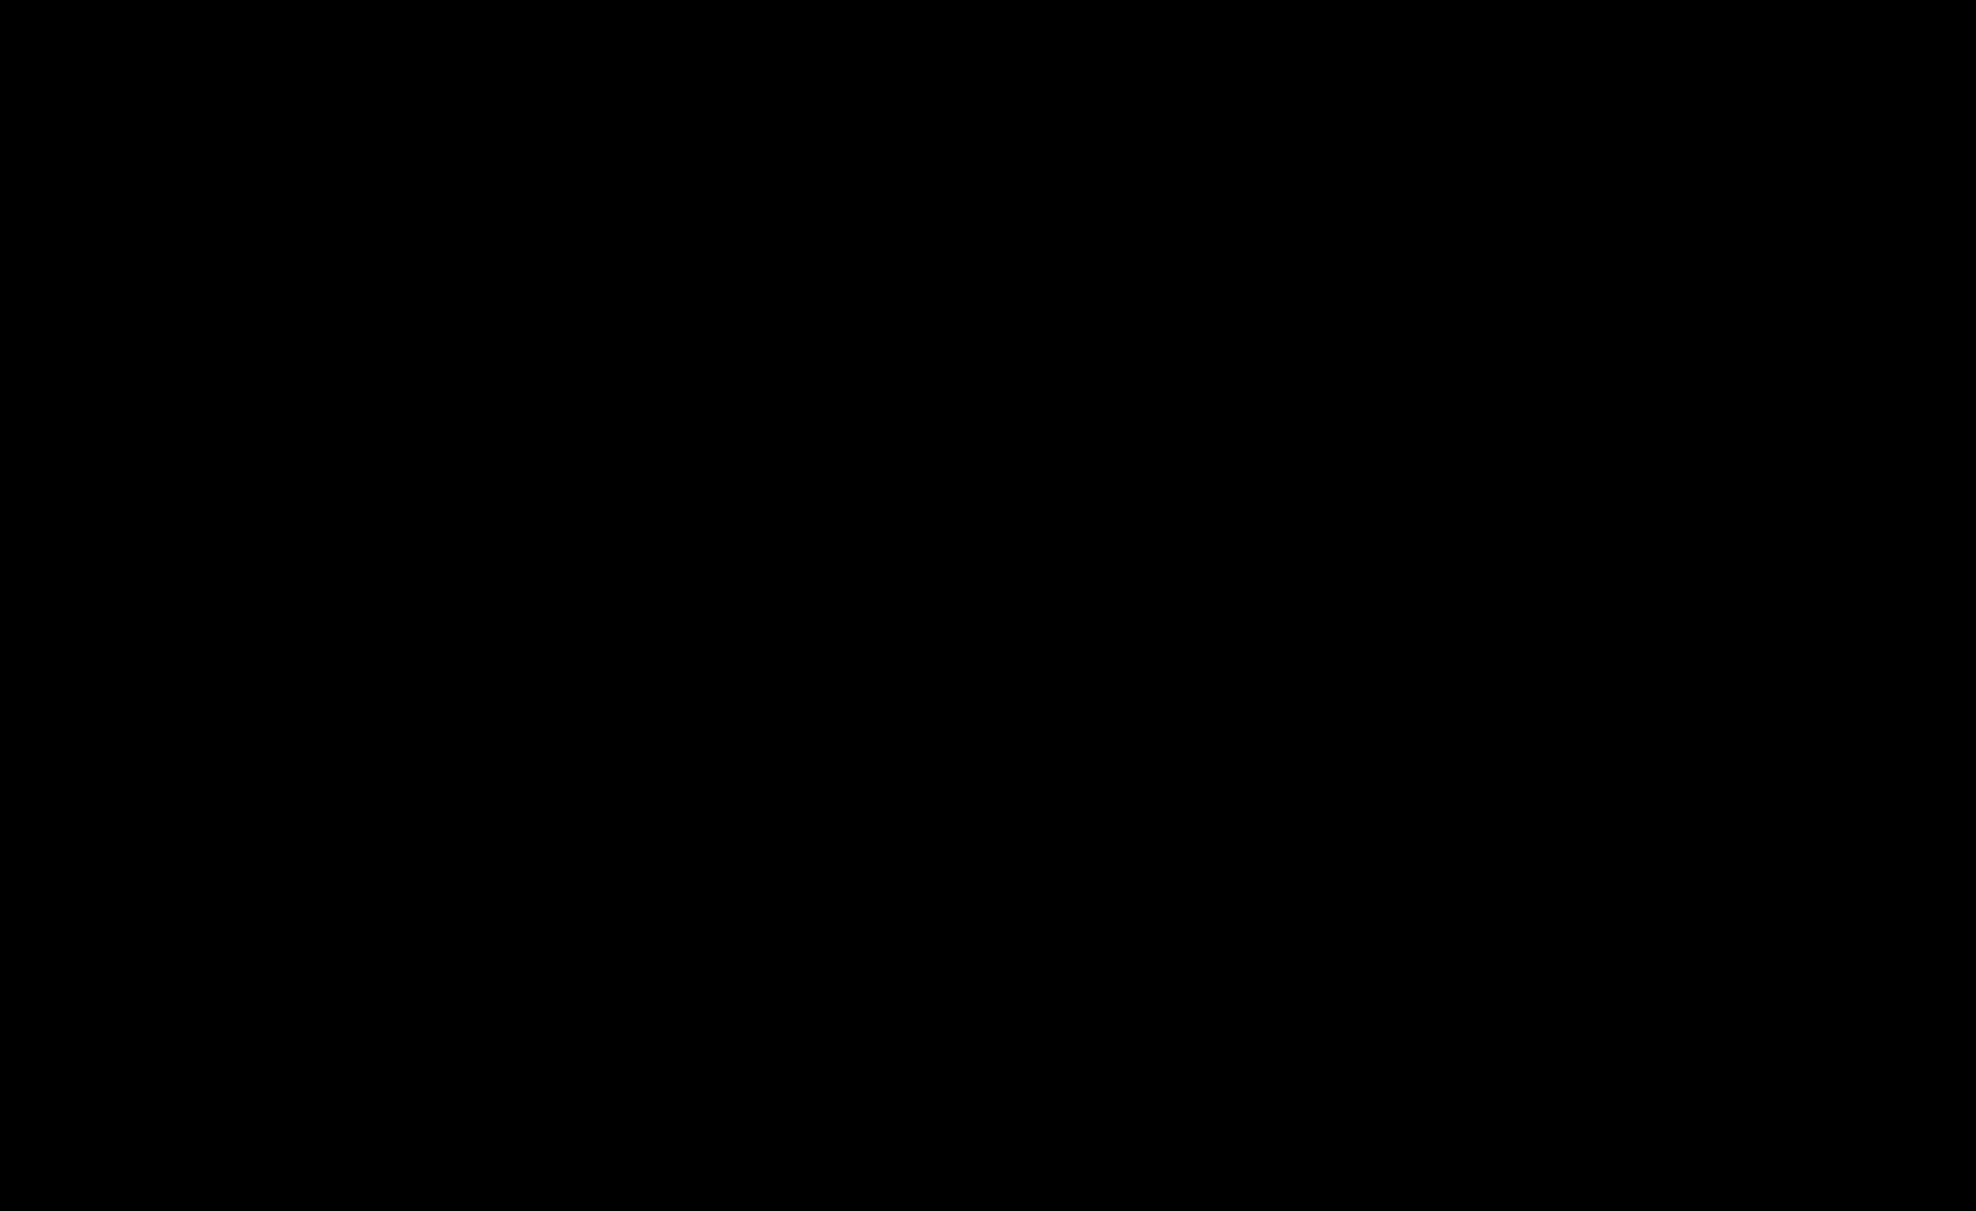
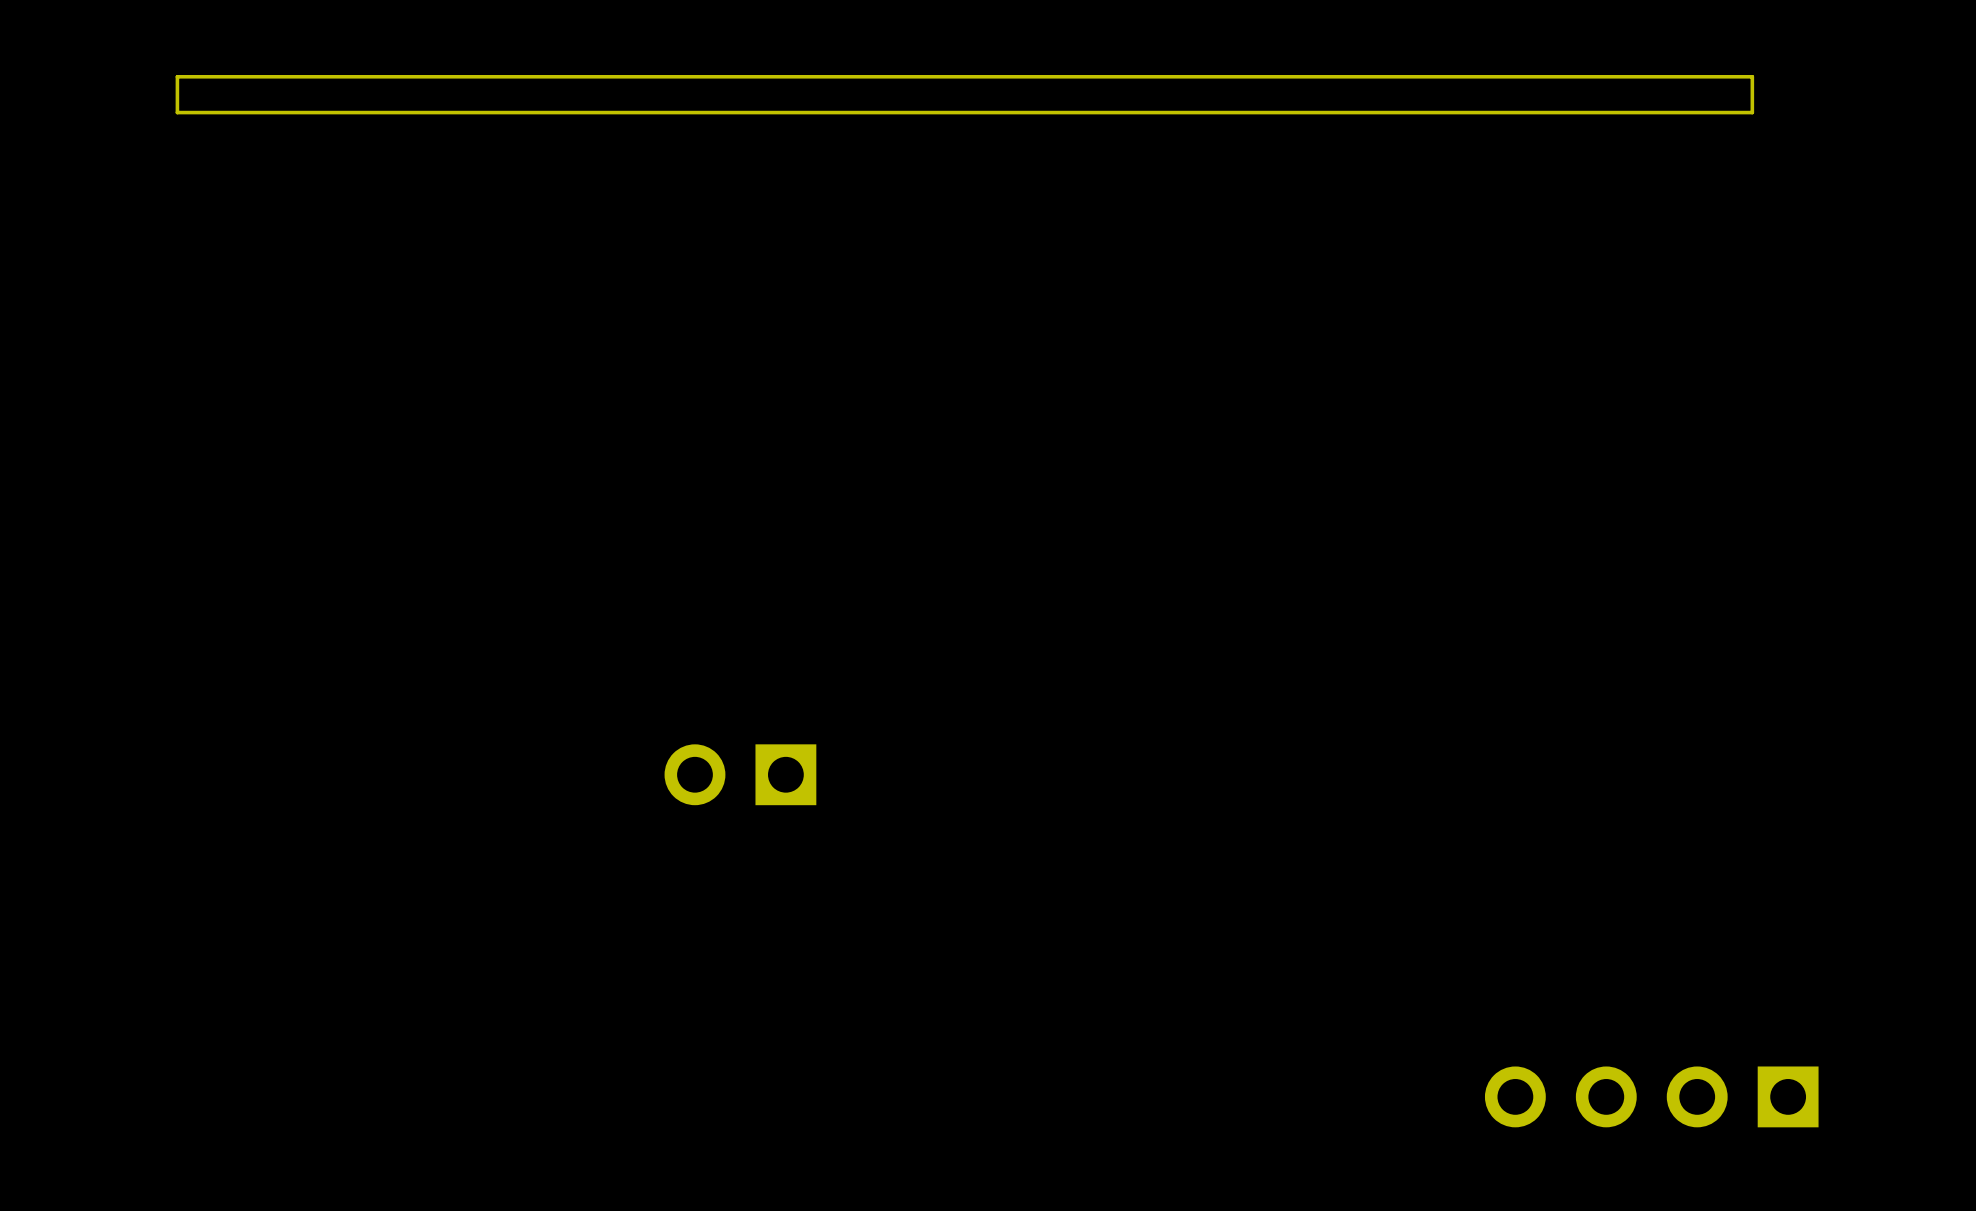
board edge: none -> (1752, 76) (177, 76) (177, 112) (1752, 112) (1752, 76)
part: none -> (740, 774)
part: none -> (1651, 1096)

